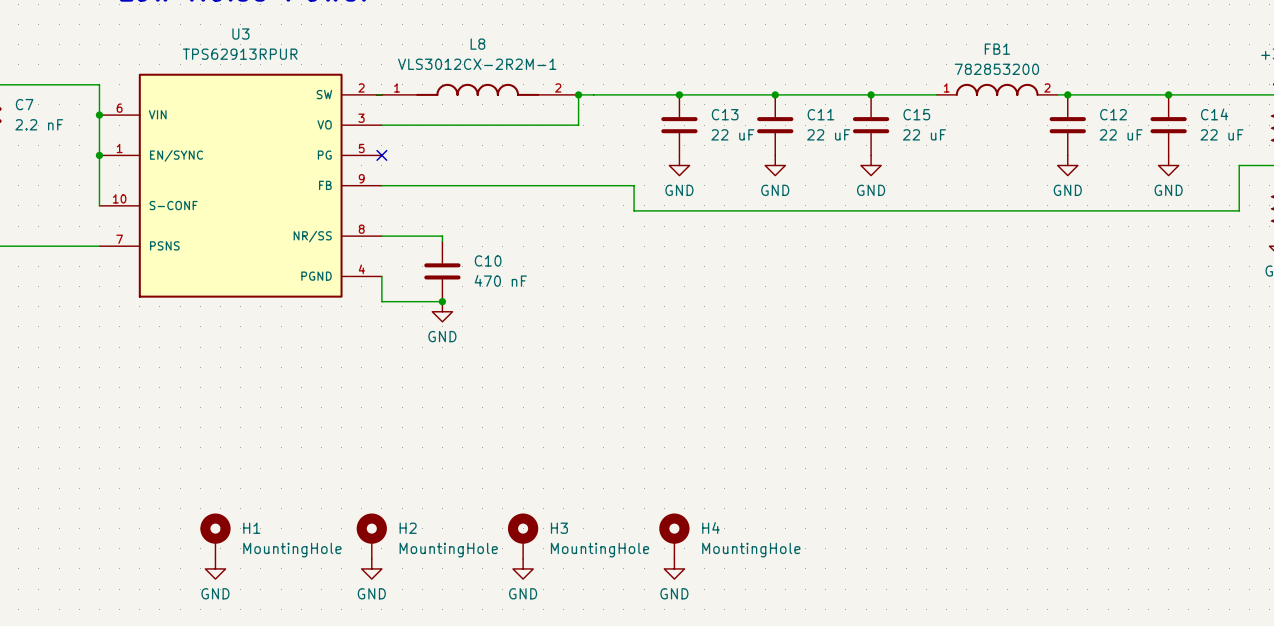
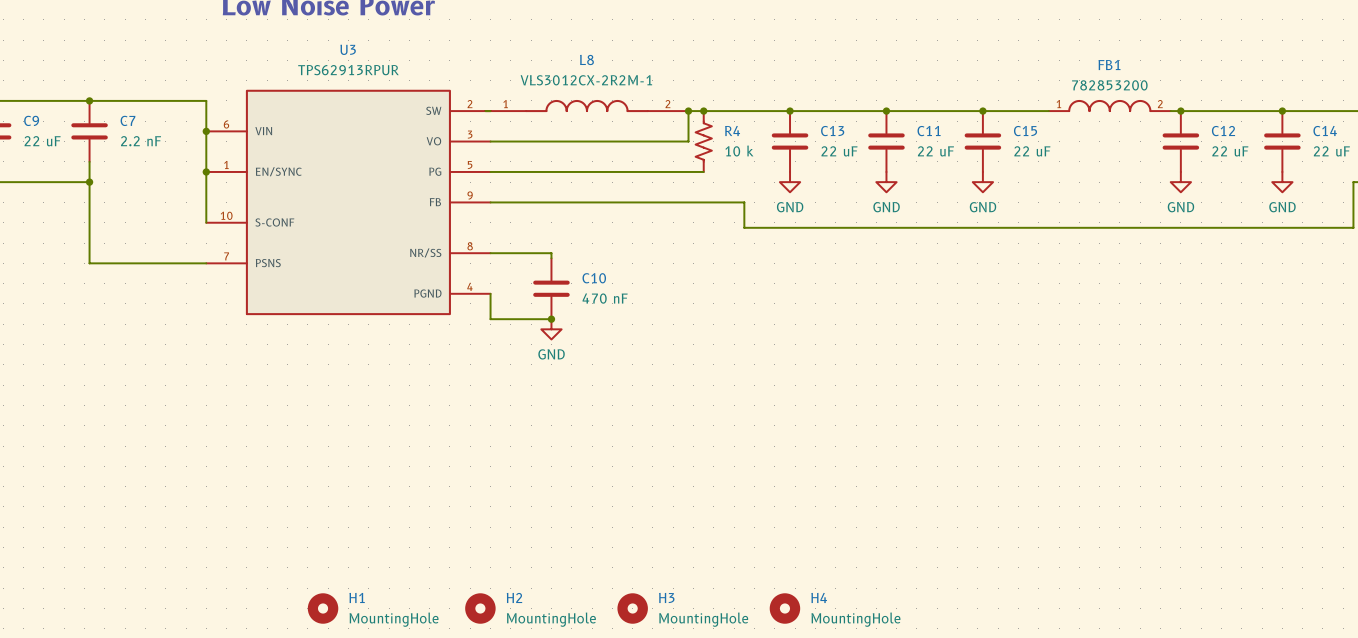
junction: none -> (703, 111)
R4: none -> 10 k (703, 141)
wire: none -> (490, 171) (703, 171)
no-connect mark: (381, 155) -> none
H1 symbol: [200, 513, 231, 559] -> [307, 593, 339, 624]
H2 symbol: [356, 513, 387, 559] -> [465, 593, 496, 624]
H3 symbol: [507, 513, 539, 559] -> [617, 593, 648, 624]
H4 symbol: [659, 513, 690, 559] -> [769, 593, 801, 624]
power symbol: GND (215, 568) -> none
power symbol: GND (371, 568) -> none
power symbol: GND (523, 568) -> none
power symbol: GND (674, 568) -> none

